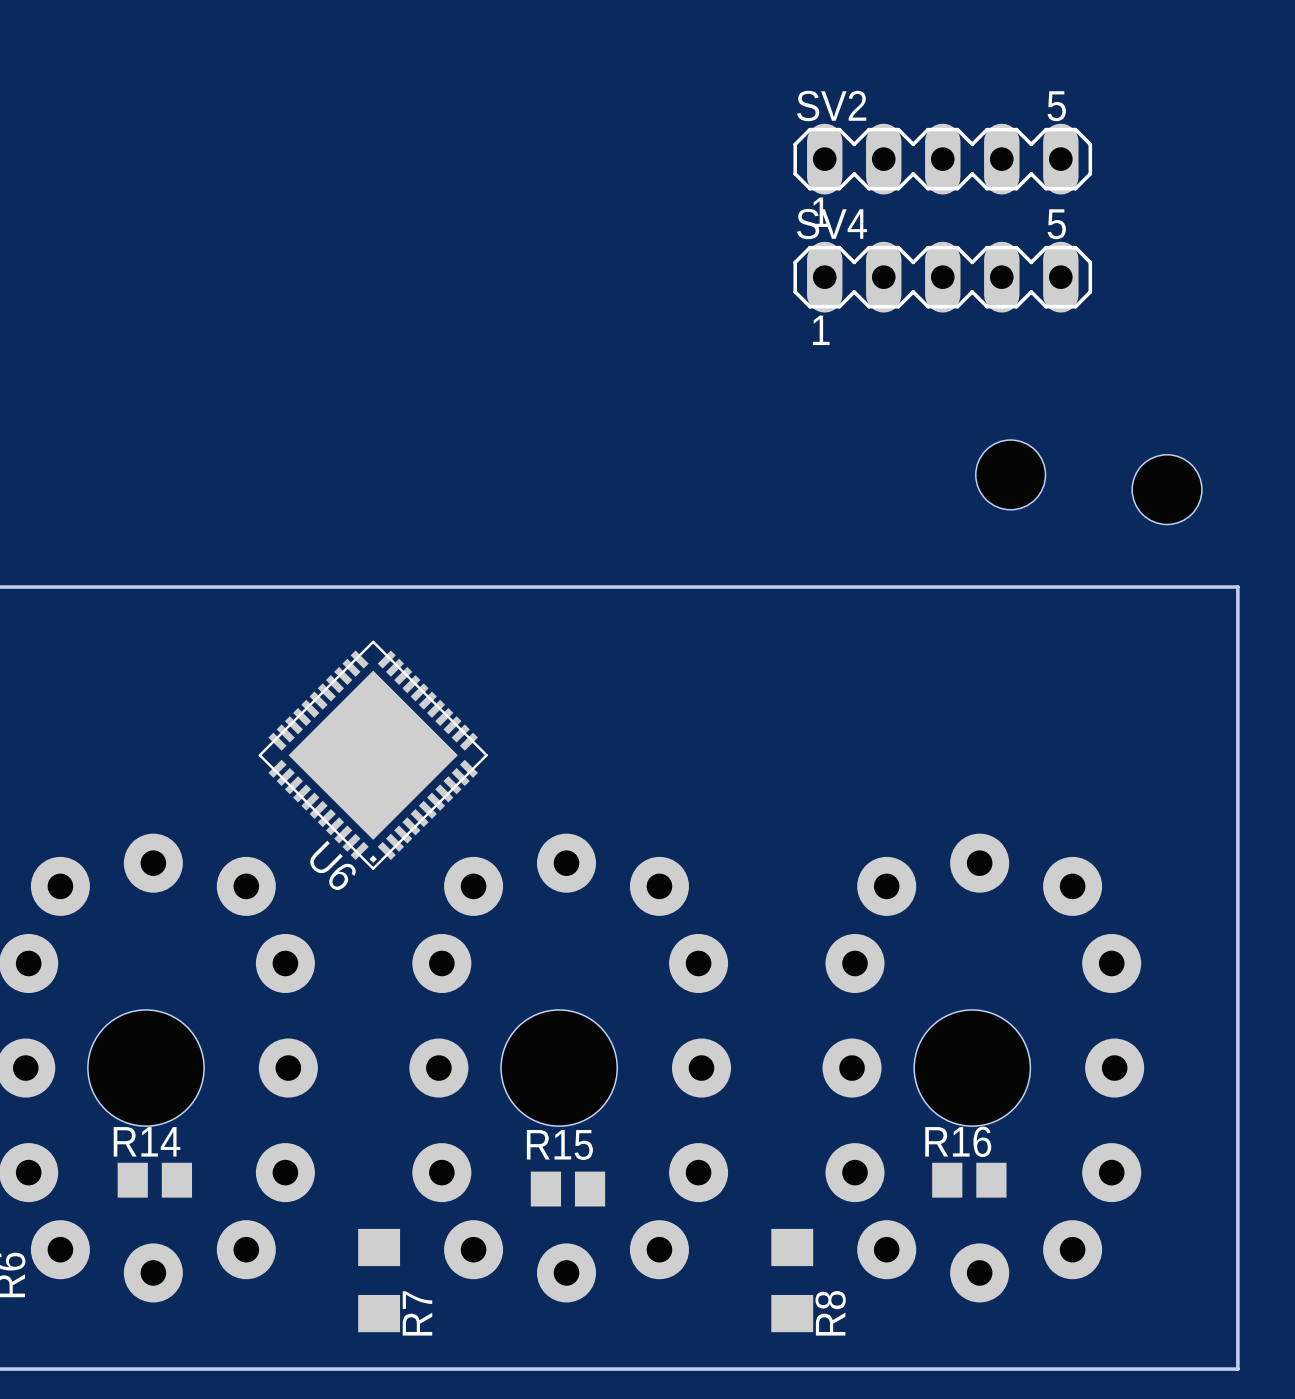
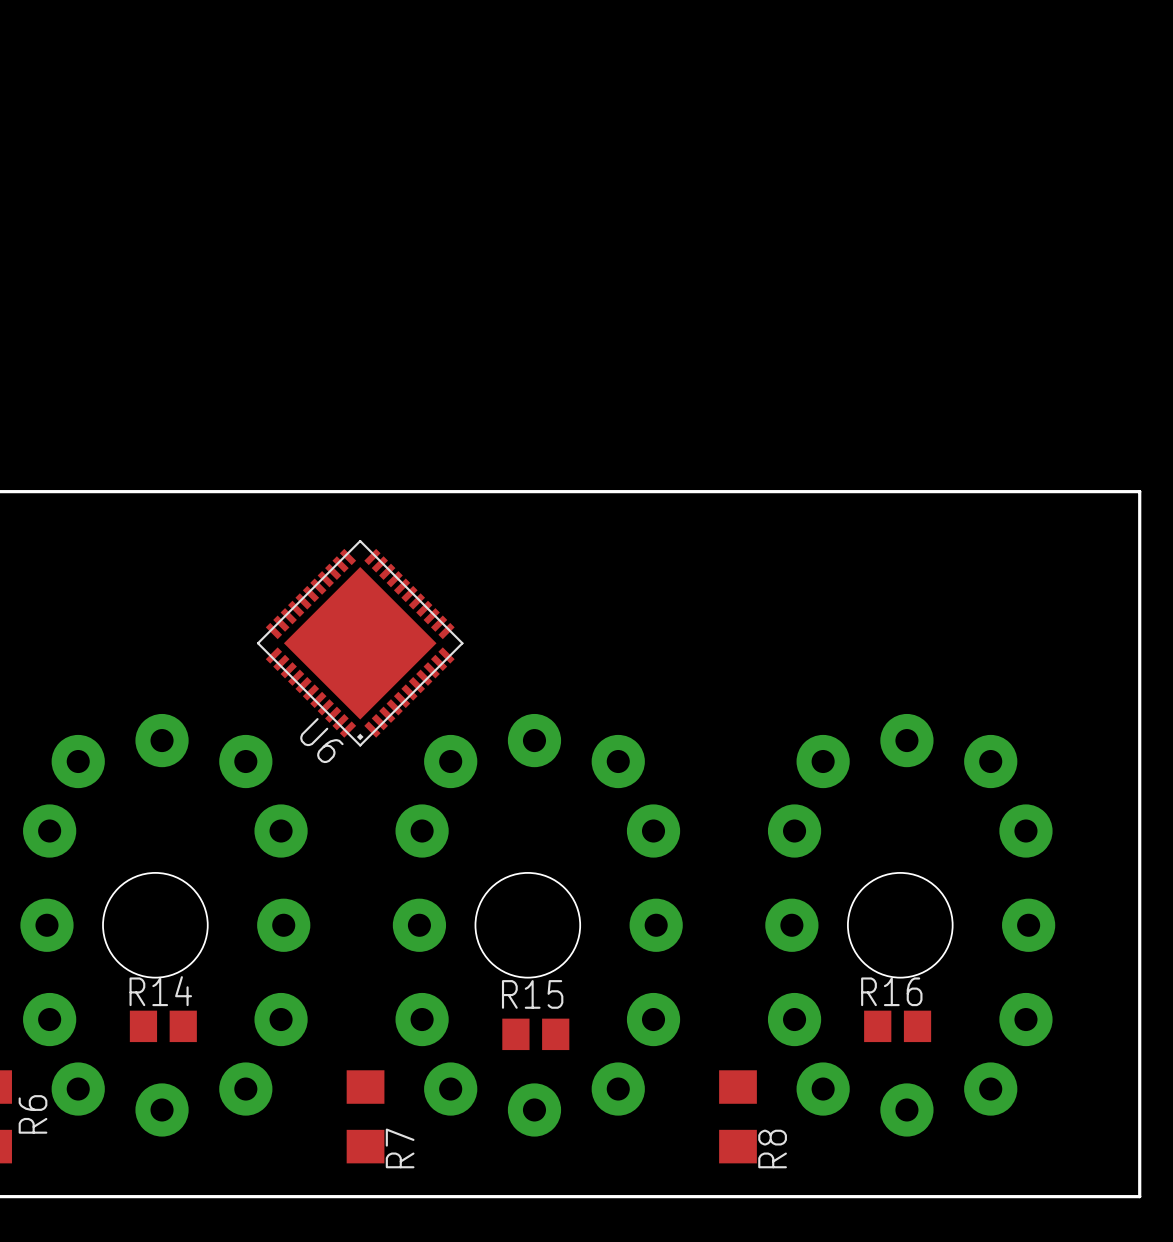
SV2: (942, 159) -> none
SV4: (942, 277) -> none
hole: (1010, 474) -> none
hole: (1167, 489) -> none

